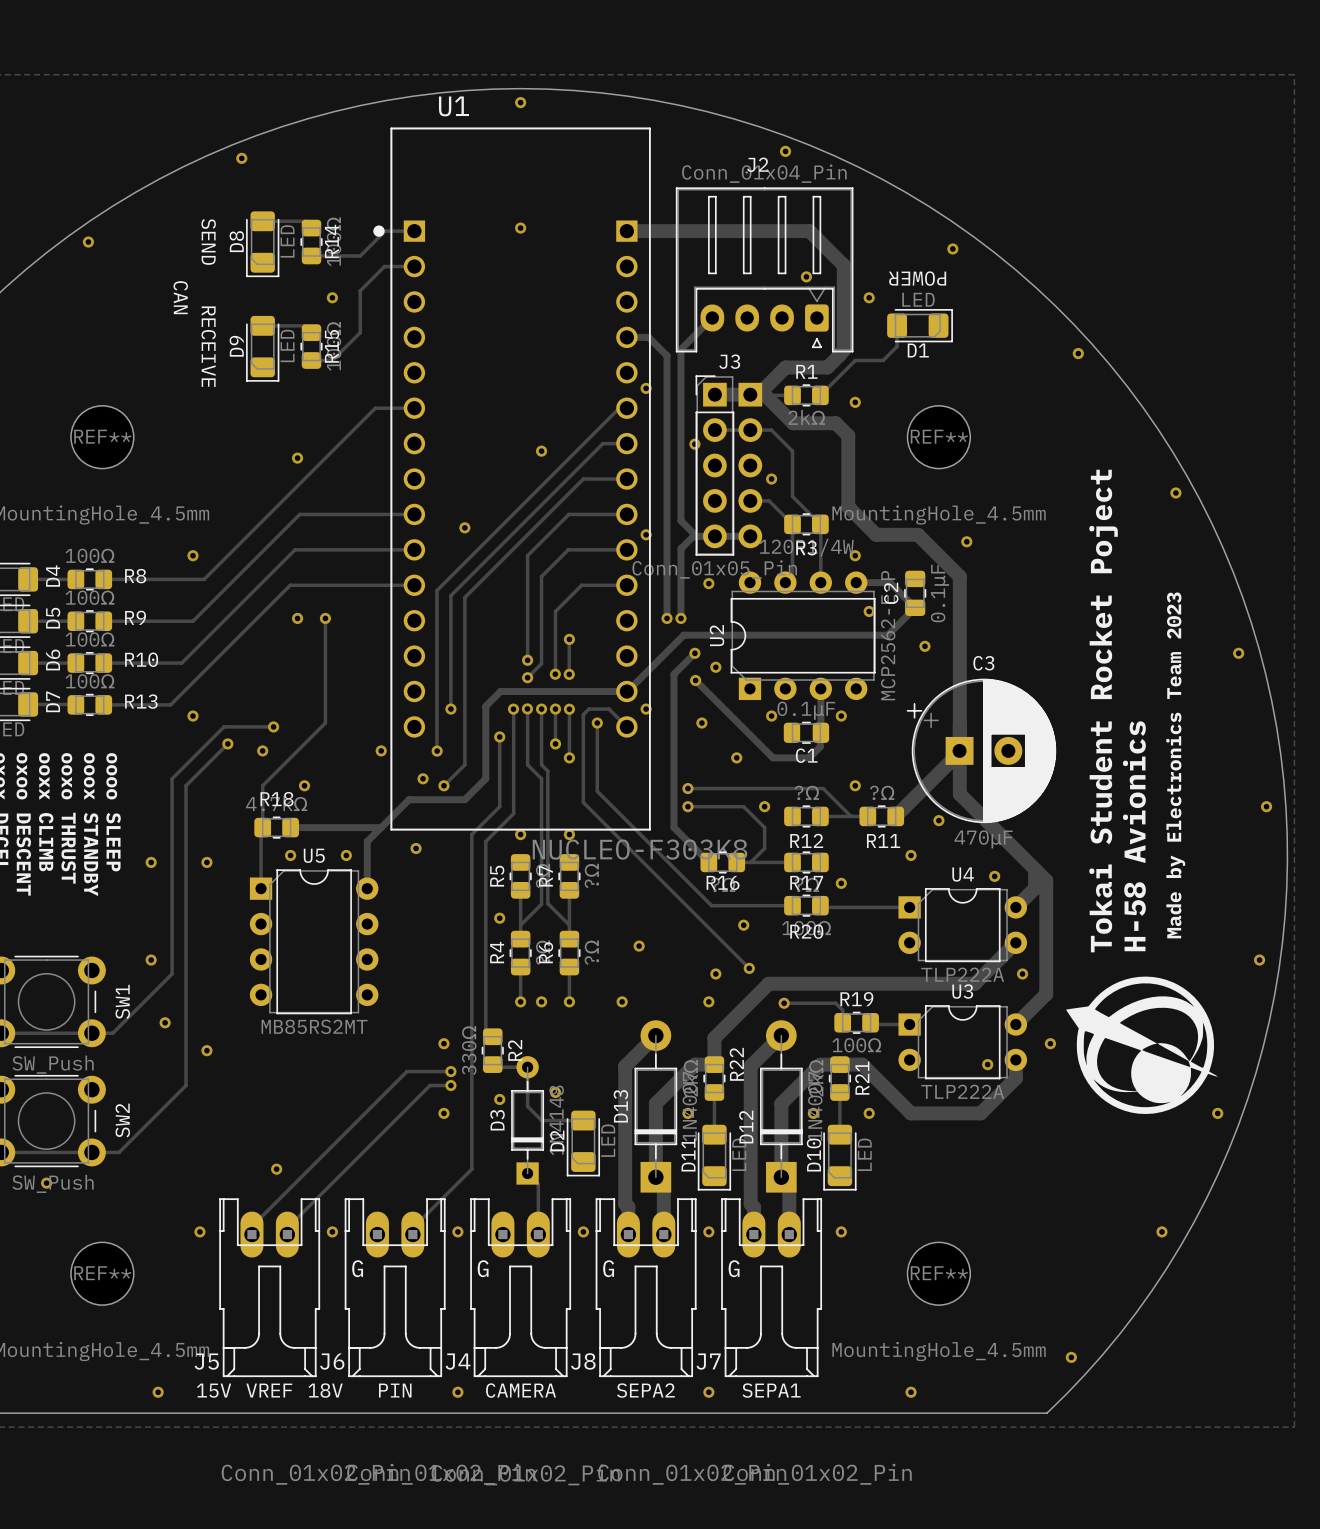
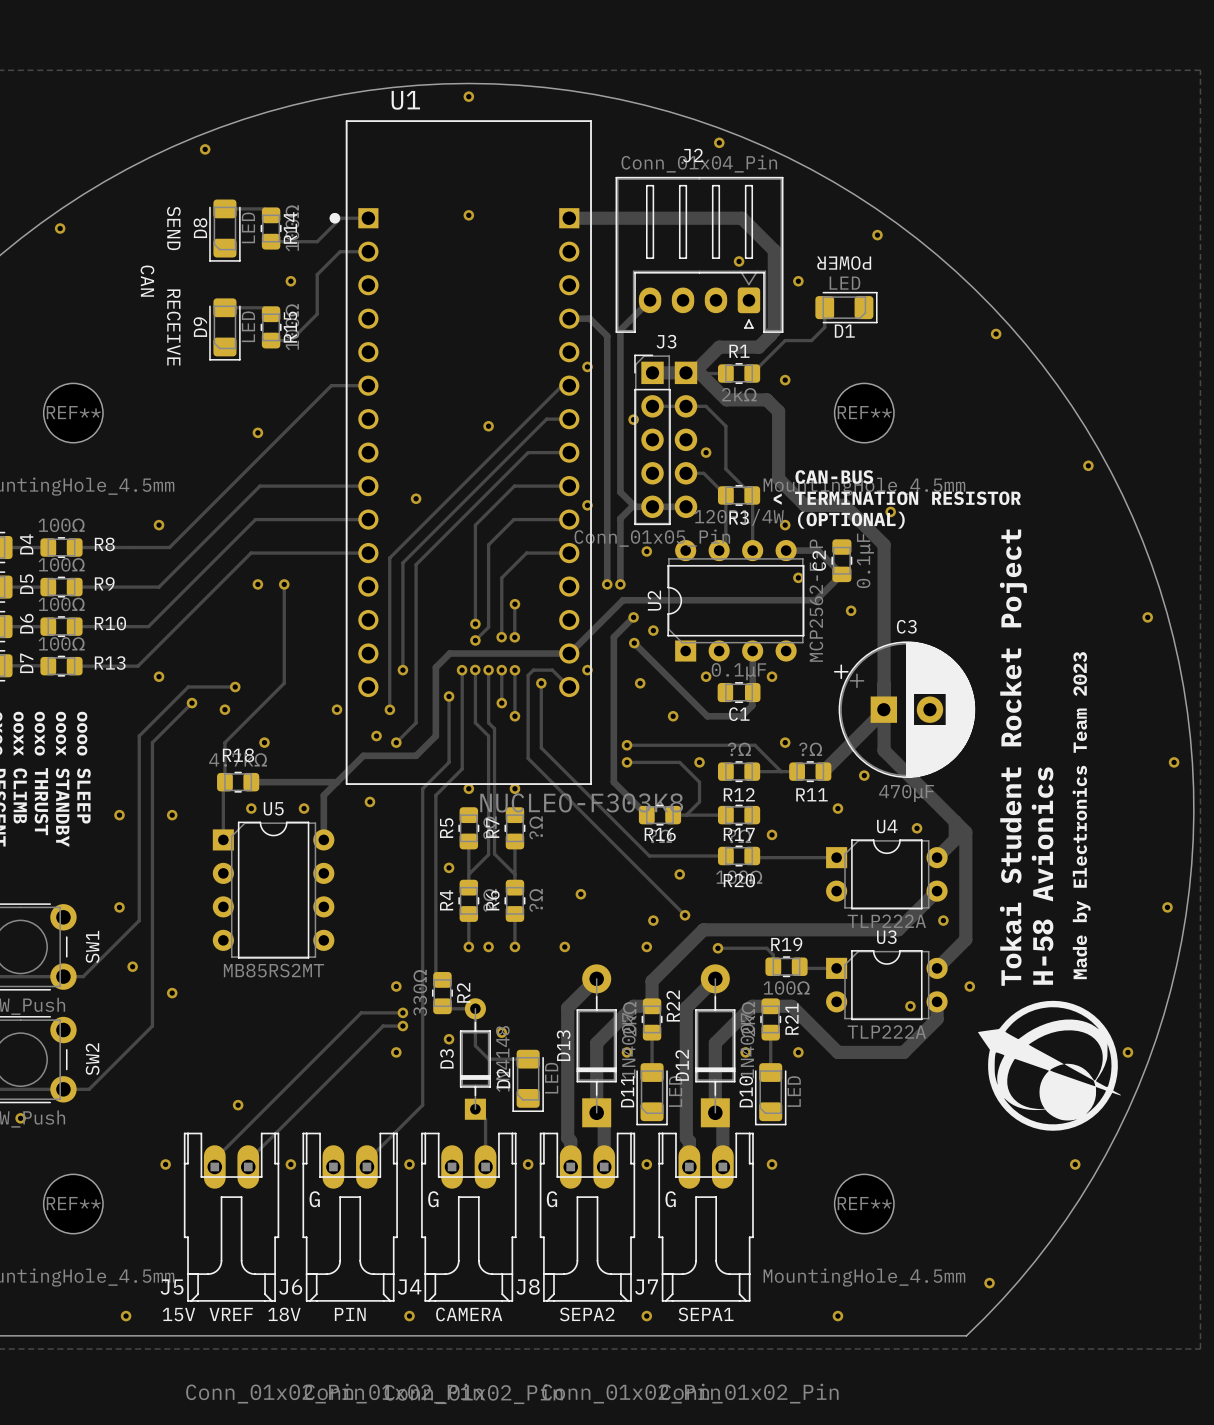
text: none -> CAN-BUS (834, 477)
text: none -> < TERMINATION RESISTOR (897, 498)
text: none -> (OPTIONAL) (851, 520)
text position: Tokai Student Rocket Poject (1103, 711) -> Tokai Student Rocket Poject (1013, 757)
text position: Made by Electronics Team 2023 (1175, 765) -> Made by Electronics Team 2023 (1081, 815)
text position: H-58 Avionics (1134, 836) -> H-58 Avionics (1042, 876)
drawing position: (1141, 1045) -> (1049, 1065)

